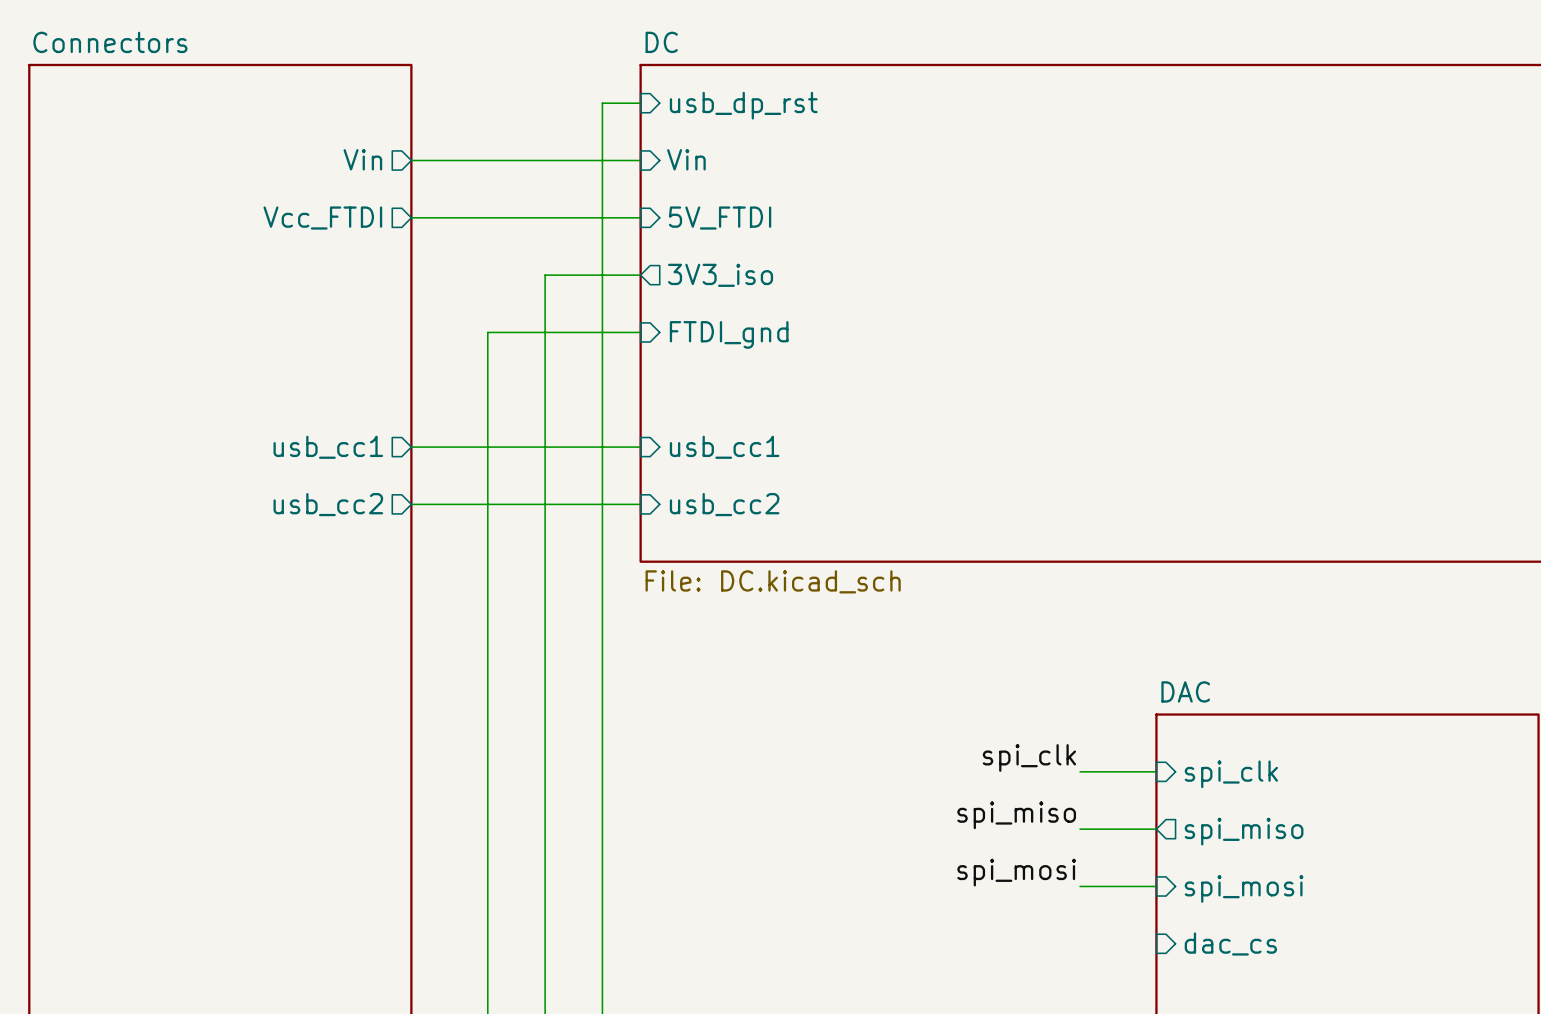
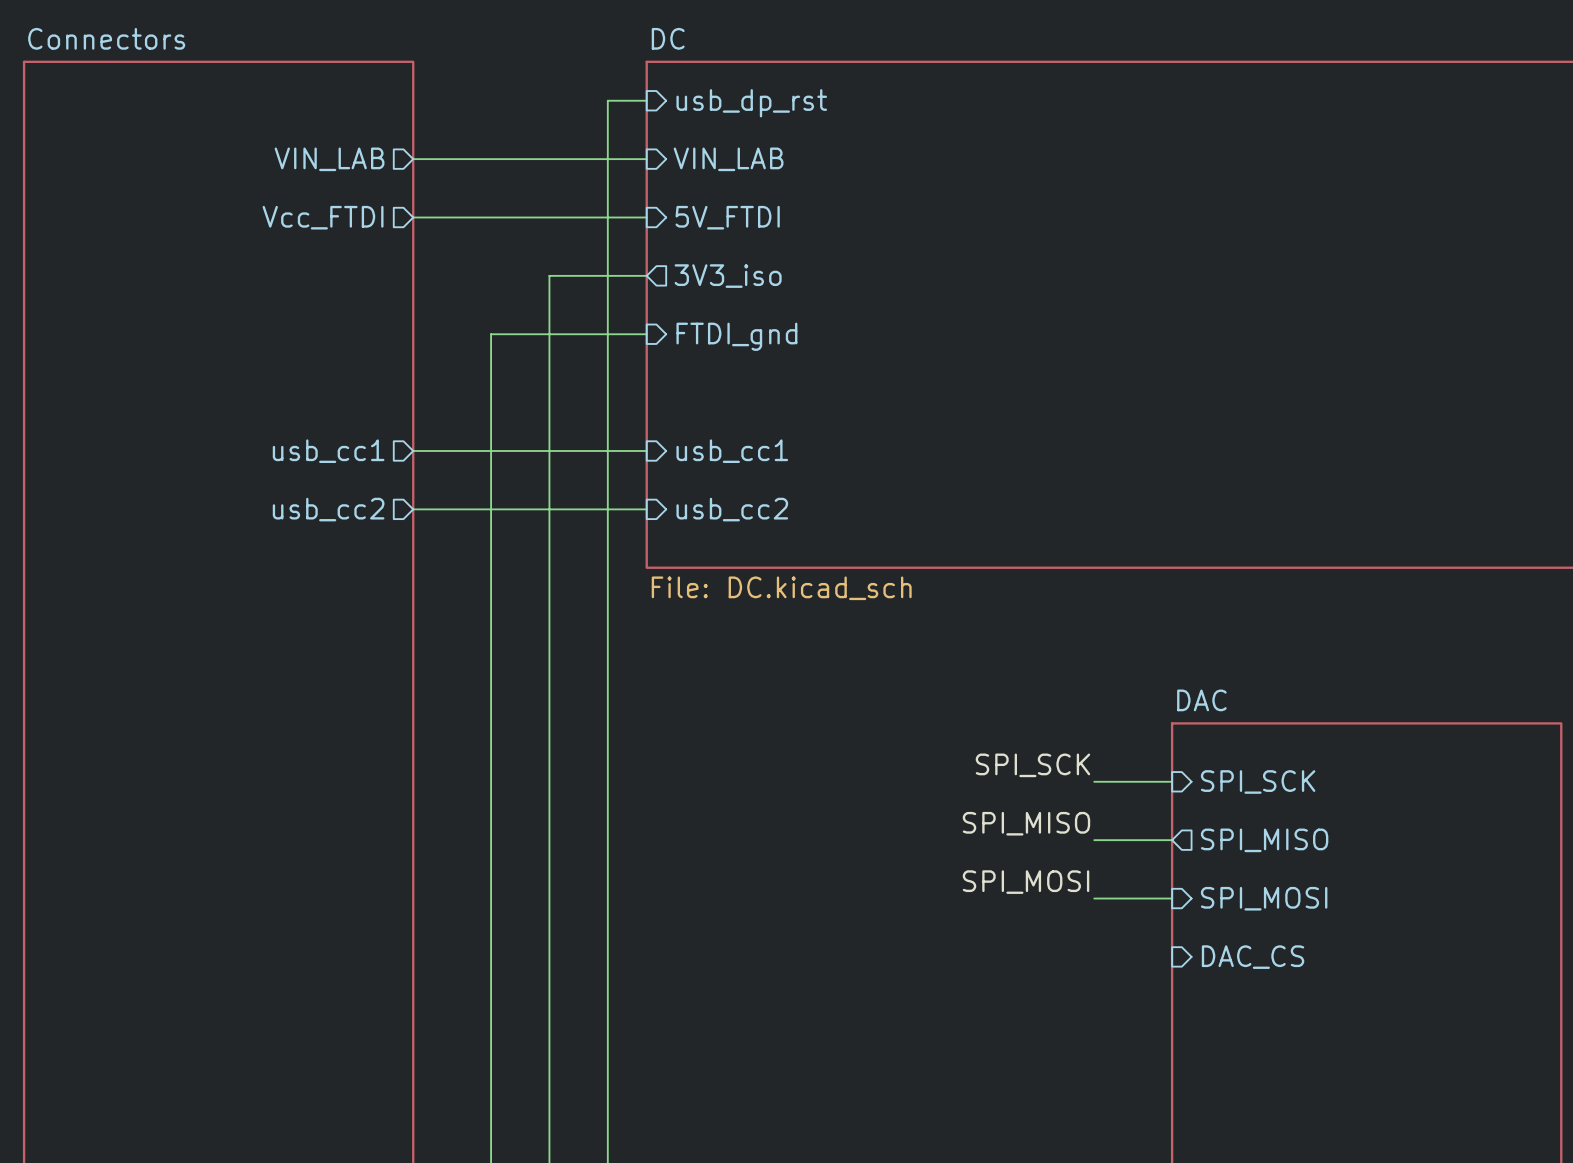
sheet pin: Vin (362, 159) -> VIN_LAB (329, 159)
sheet pin: Vin (686, 159) -> VIN_LAB (728, 159)
label: spi_clk (1029, 757) -> SPI_SCK (1032, 765)
sheet pin: spi_clk (1231, 774) -> SPI_SCK (1258, 781)
label: spi_miso (1016, 815) -> SPI_MISO (1026, 823)
sheet pin: spi_miso (1244, 831) -> SPI_MISO (1264, 840)
label: spi_mosi (1016, 872) -> SPI_MOSI (1026, 882)
sheet pin: spi_mosi (1244, 888) -> SPI_MOSI (1264, 898)
sheet pin: dac_cs (1230, 943) -> DAC_CS (1253, 957)

